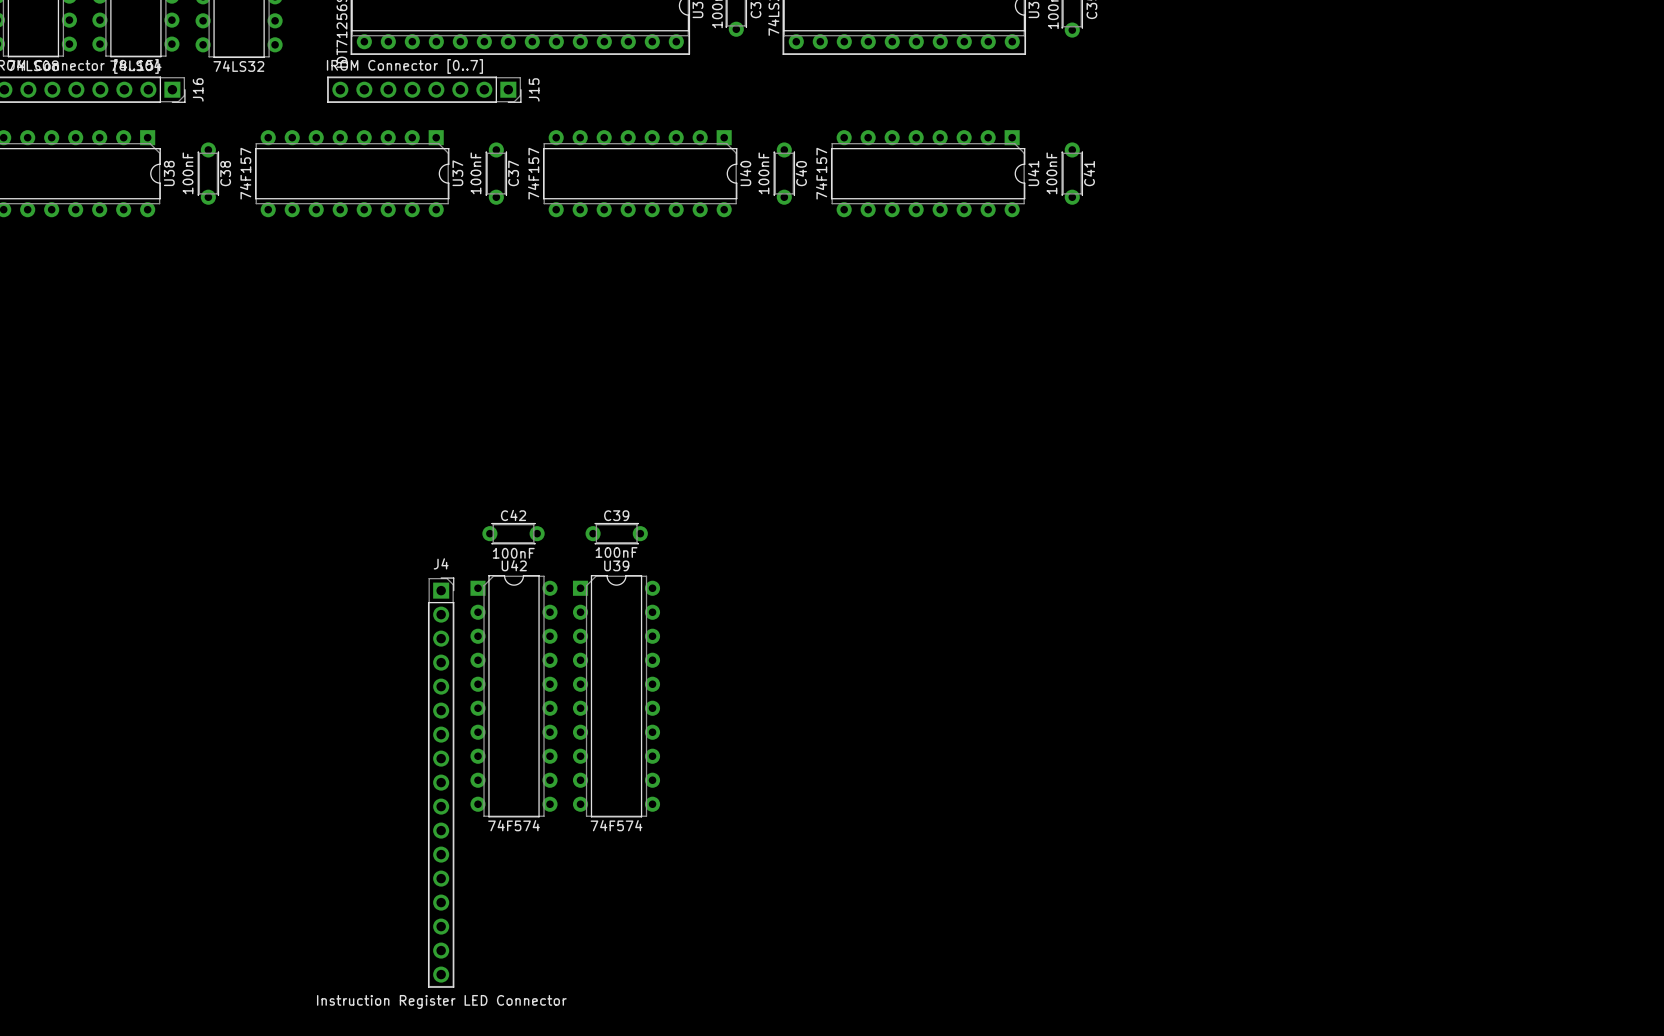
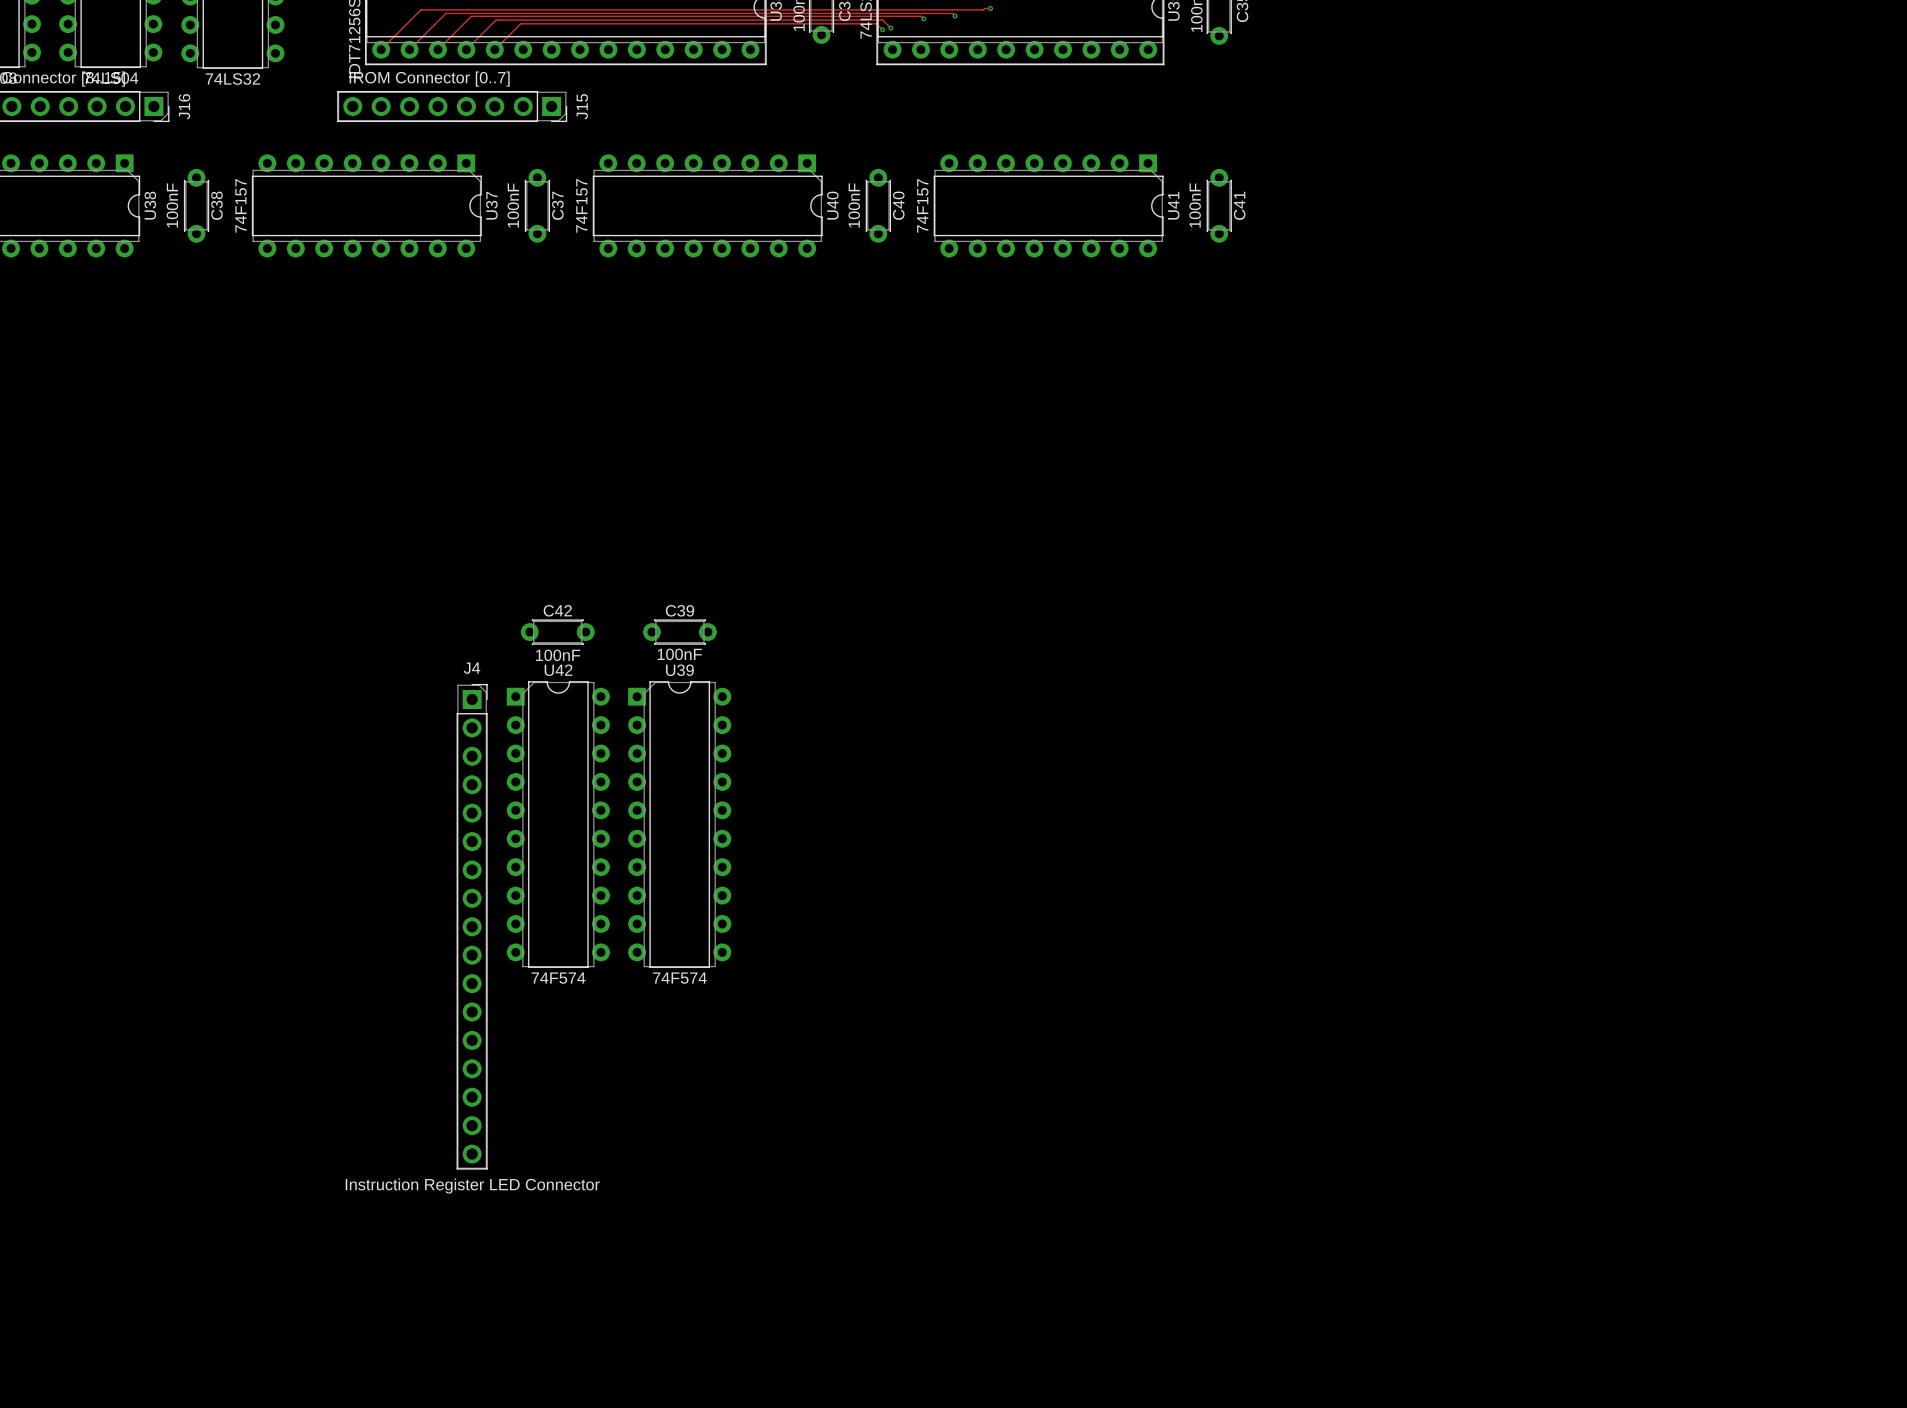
track: none -> (990, 8) (420, 9) (381, 49)
via: none -> (990, 8)
track: none -> (955, 15) (952, 13) (445, 13) (409, 49)
via: none -> (955, 15)
track: none -> (923, 18) (921, 16) (471, 16) (438, 49)
via: none -> (923, 18)
track: none -> (890, 28) (882, 20) (496, 20) (466, 49)
via: none -> (890, 28)
track: none -> (882, 29) (876, 23) (520, 23) (494, 49)
via: none -> (882, 29)

